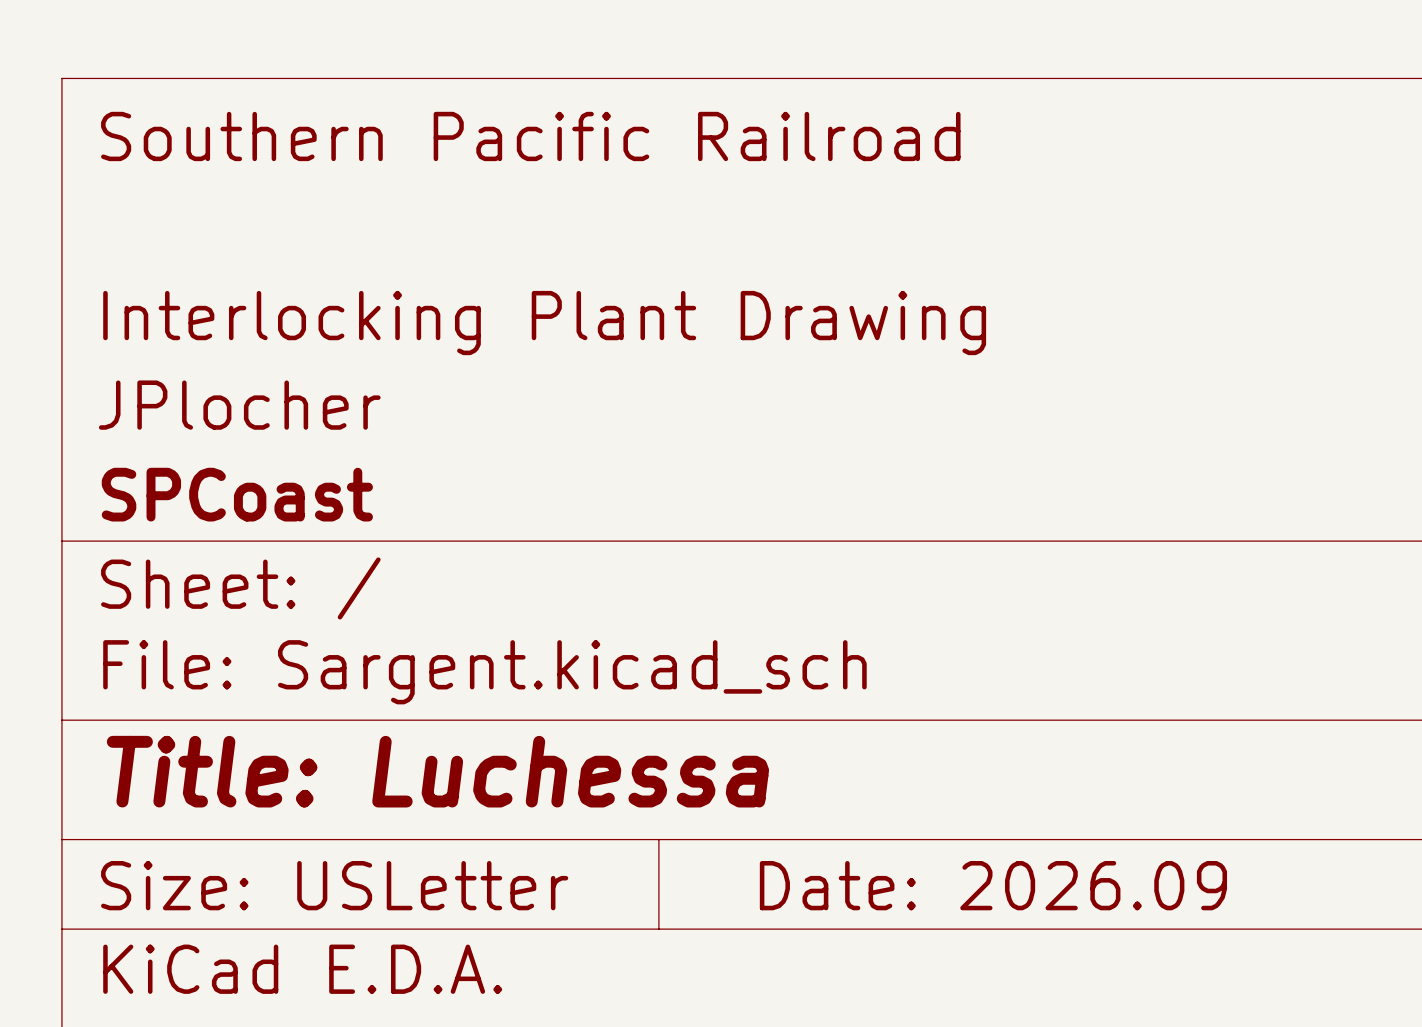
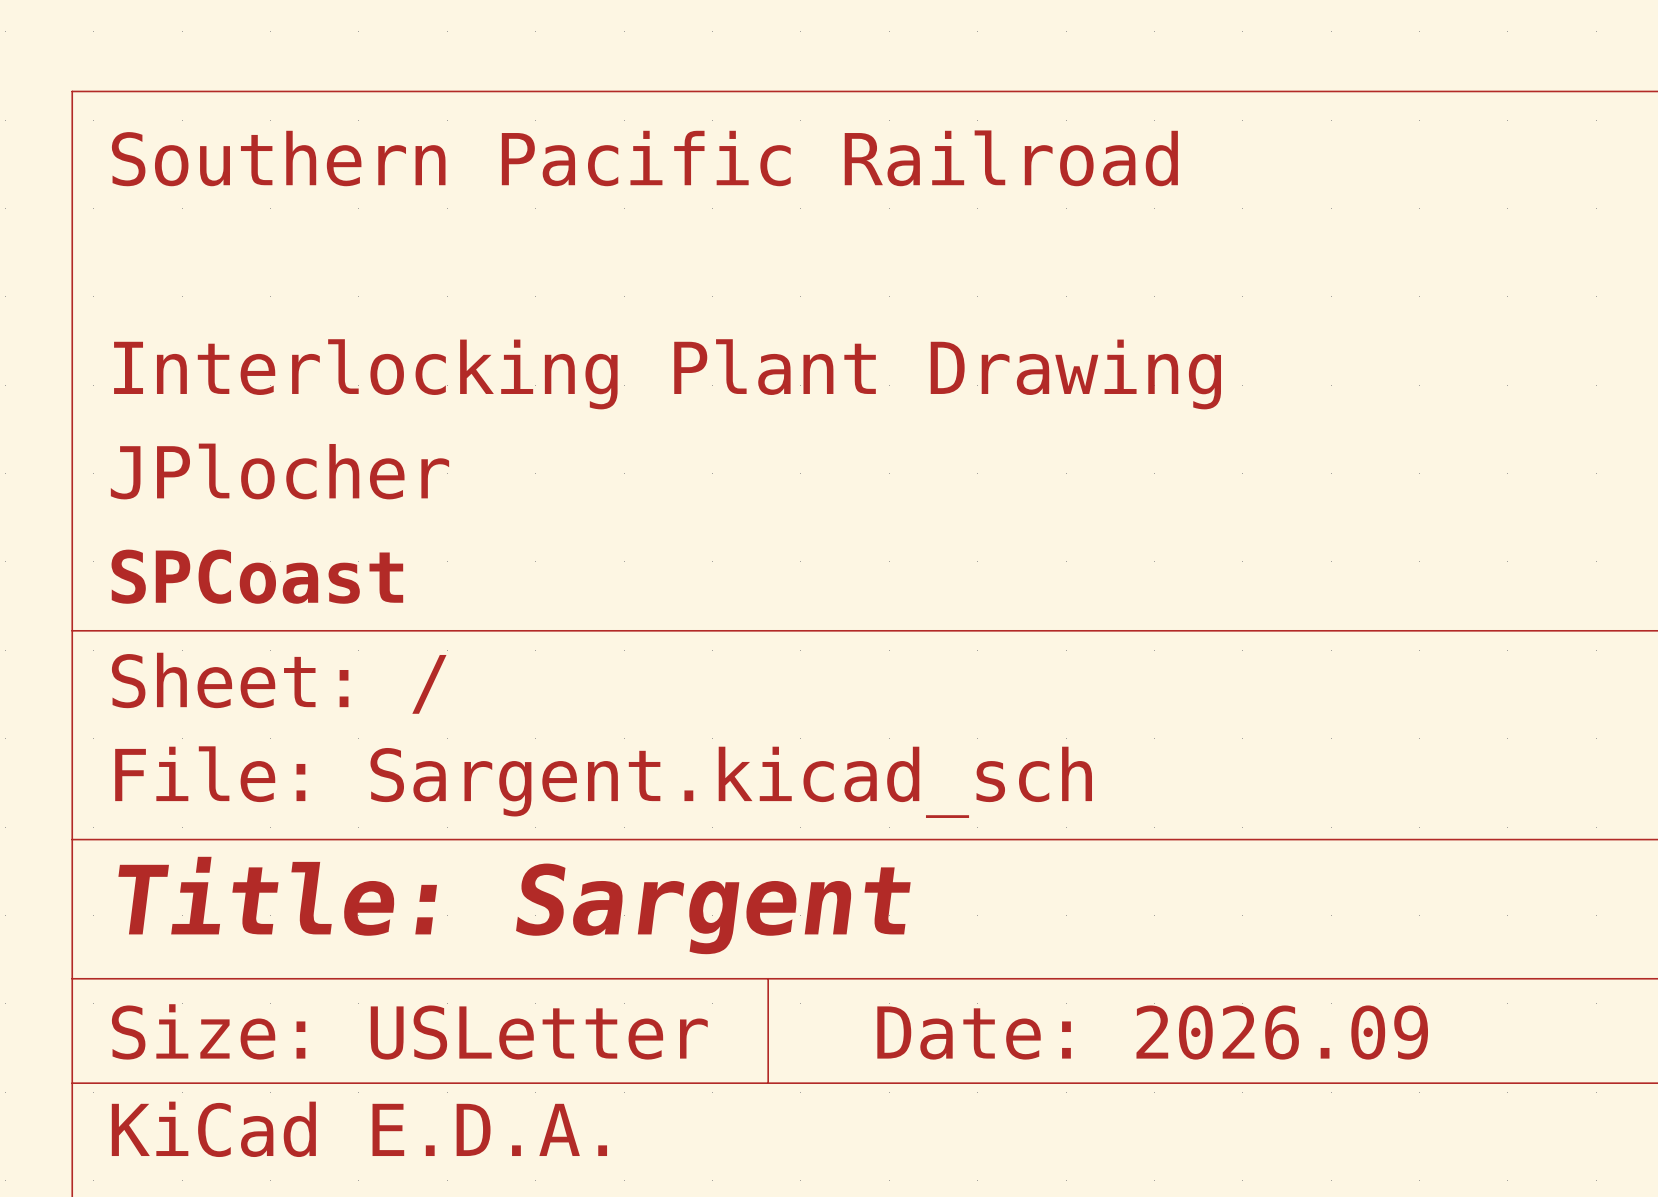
title block: Title: Luchessa (437, 771) -> Title: Sargent (514, 905)

